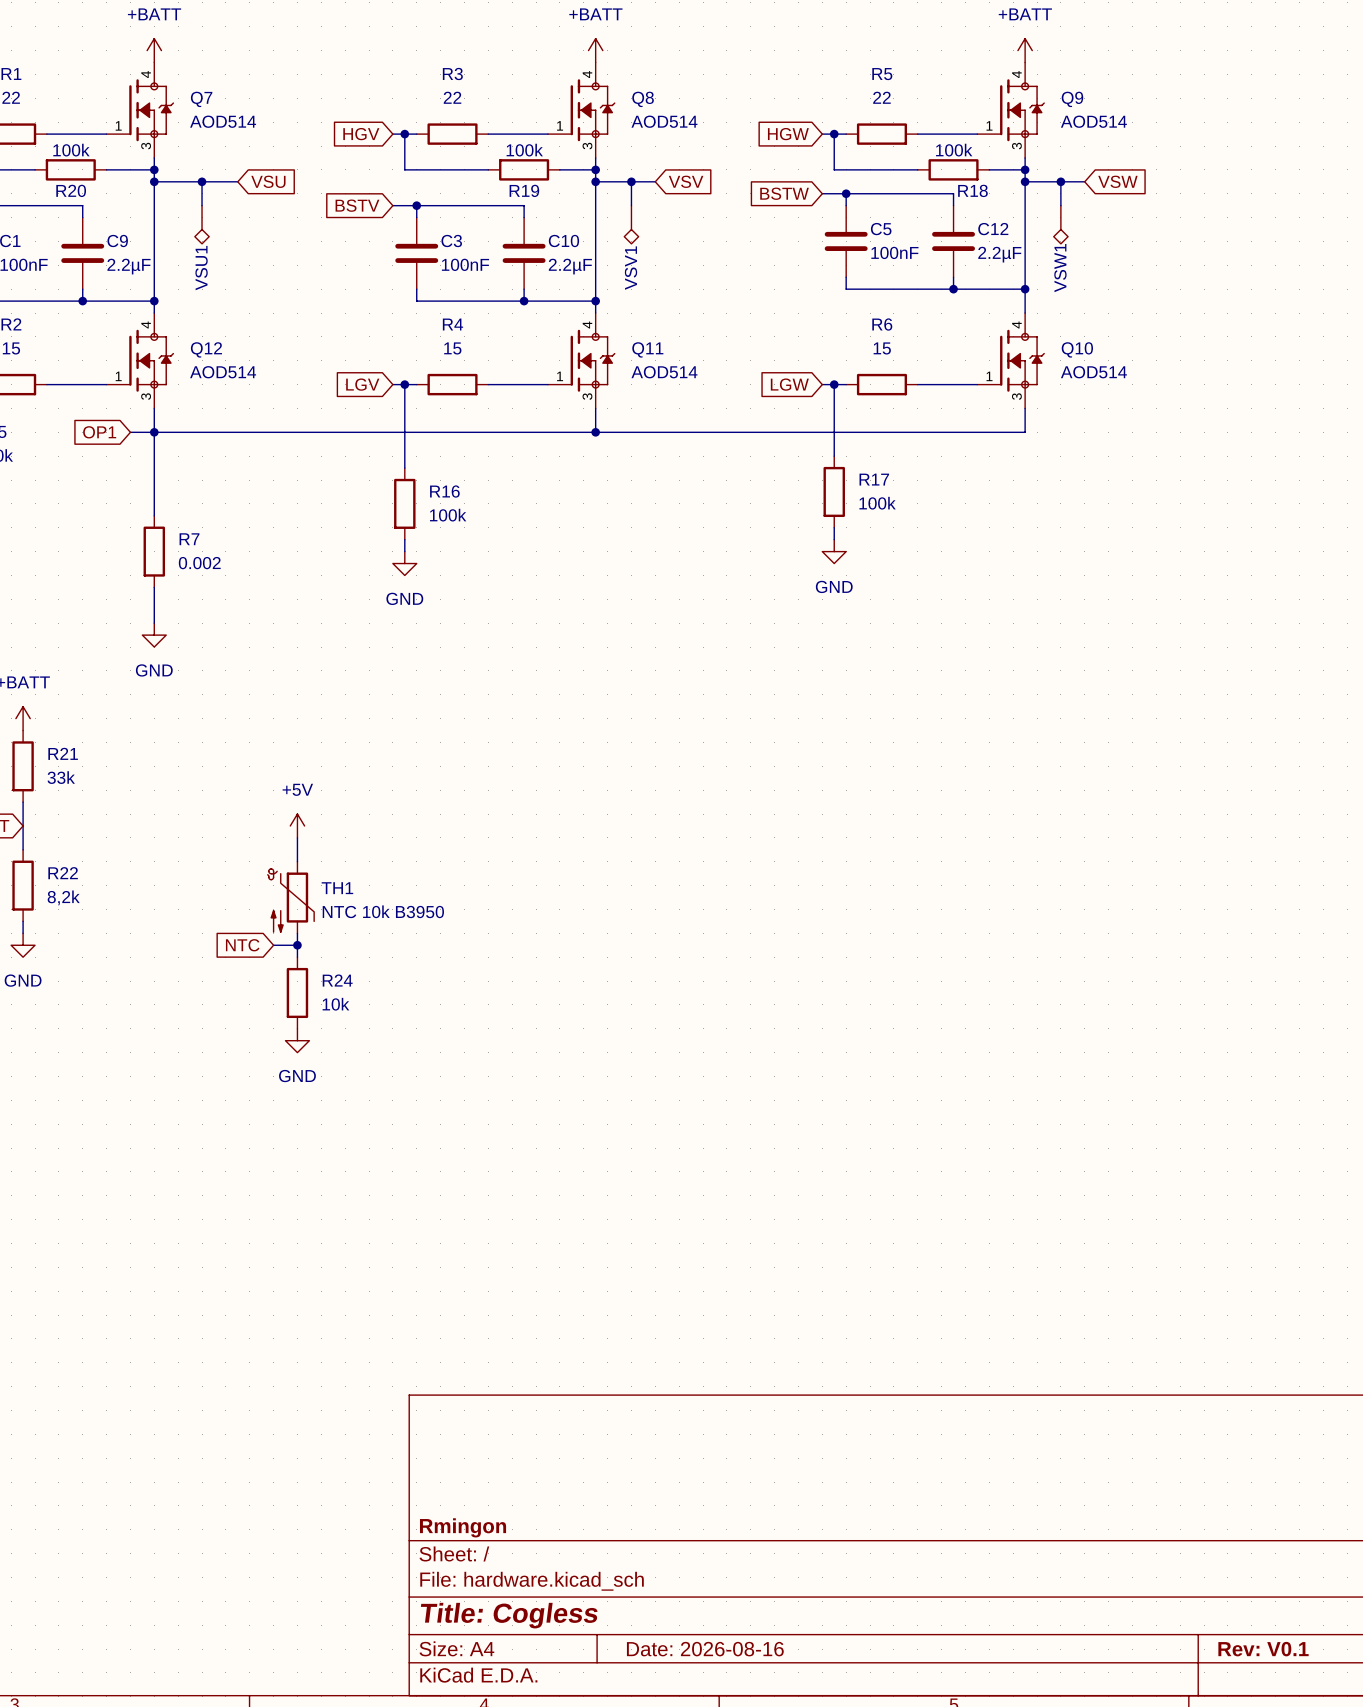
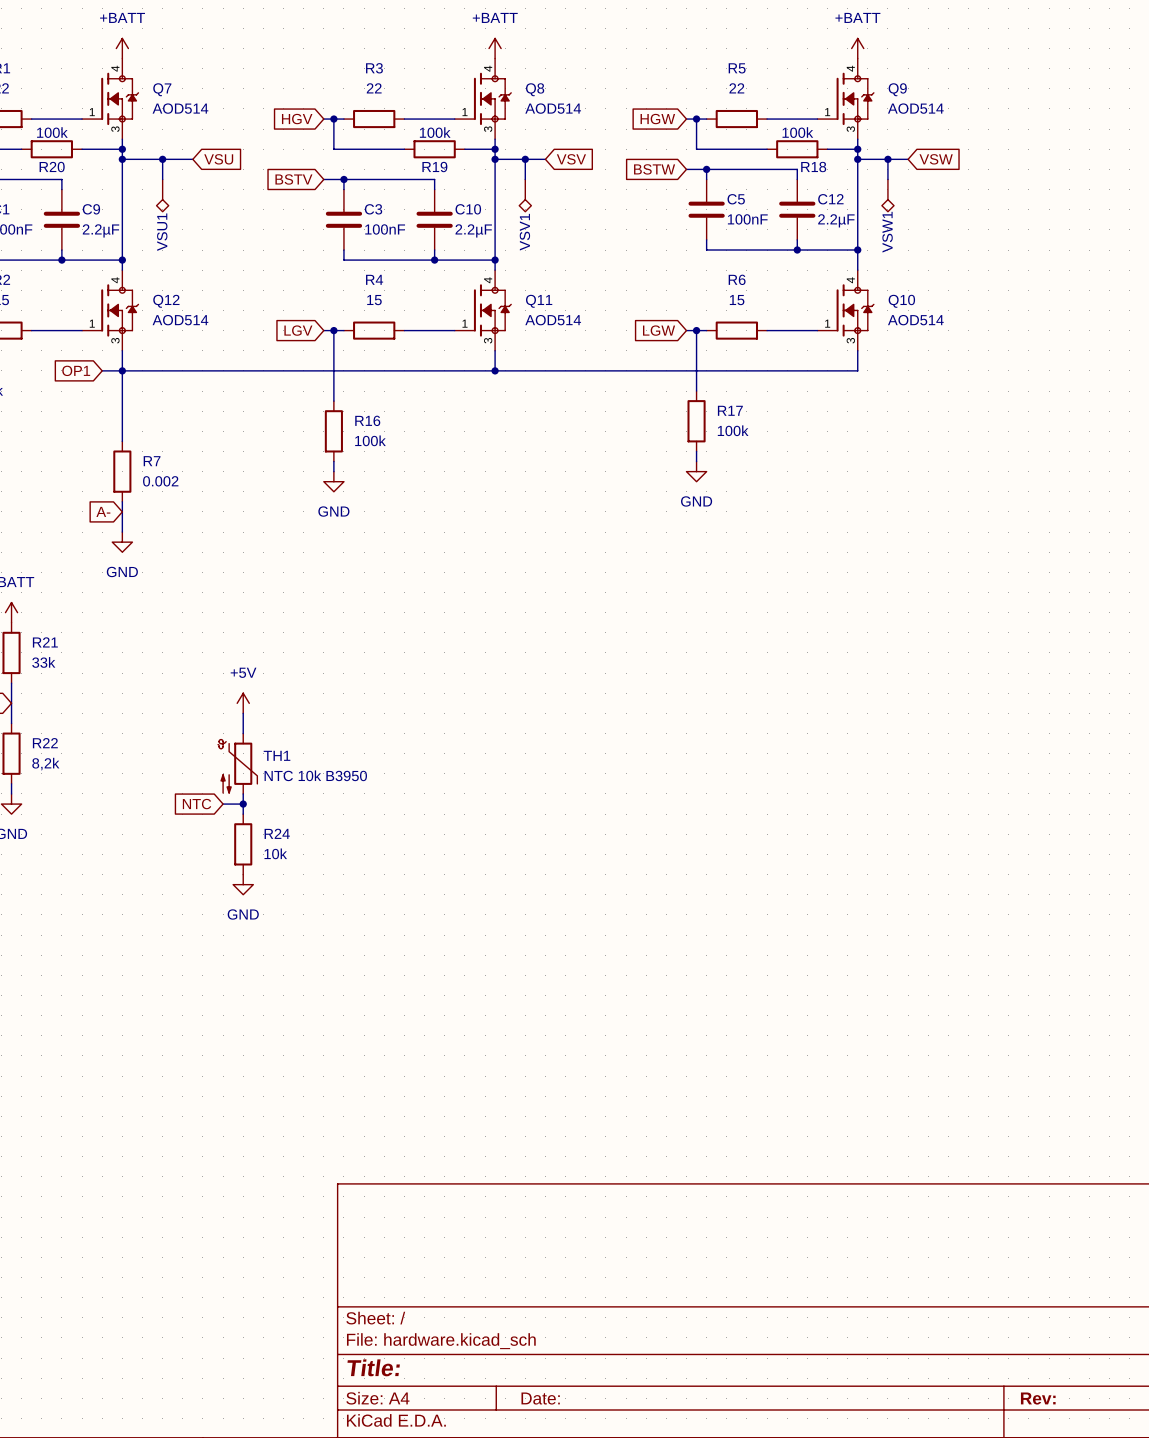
global label: none -> A- (103, 511)
title block: Rmingon (463, 1527) -> none
title block: Title: Cogless (509, 1615) -> Title: (373, 1367)
title block: Date: 2026-08-16 (705, 1649) -> Date: (540, 1398)
title block: Rev: V0.1 (1263, 1649) -> Rev: (1038, 1398)

